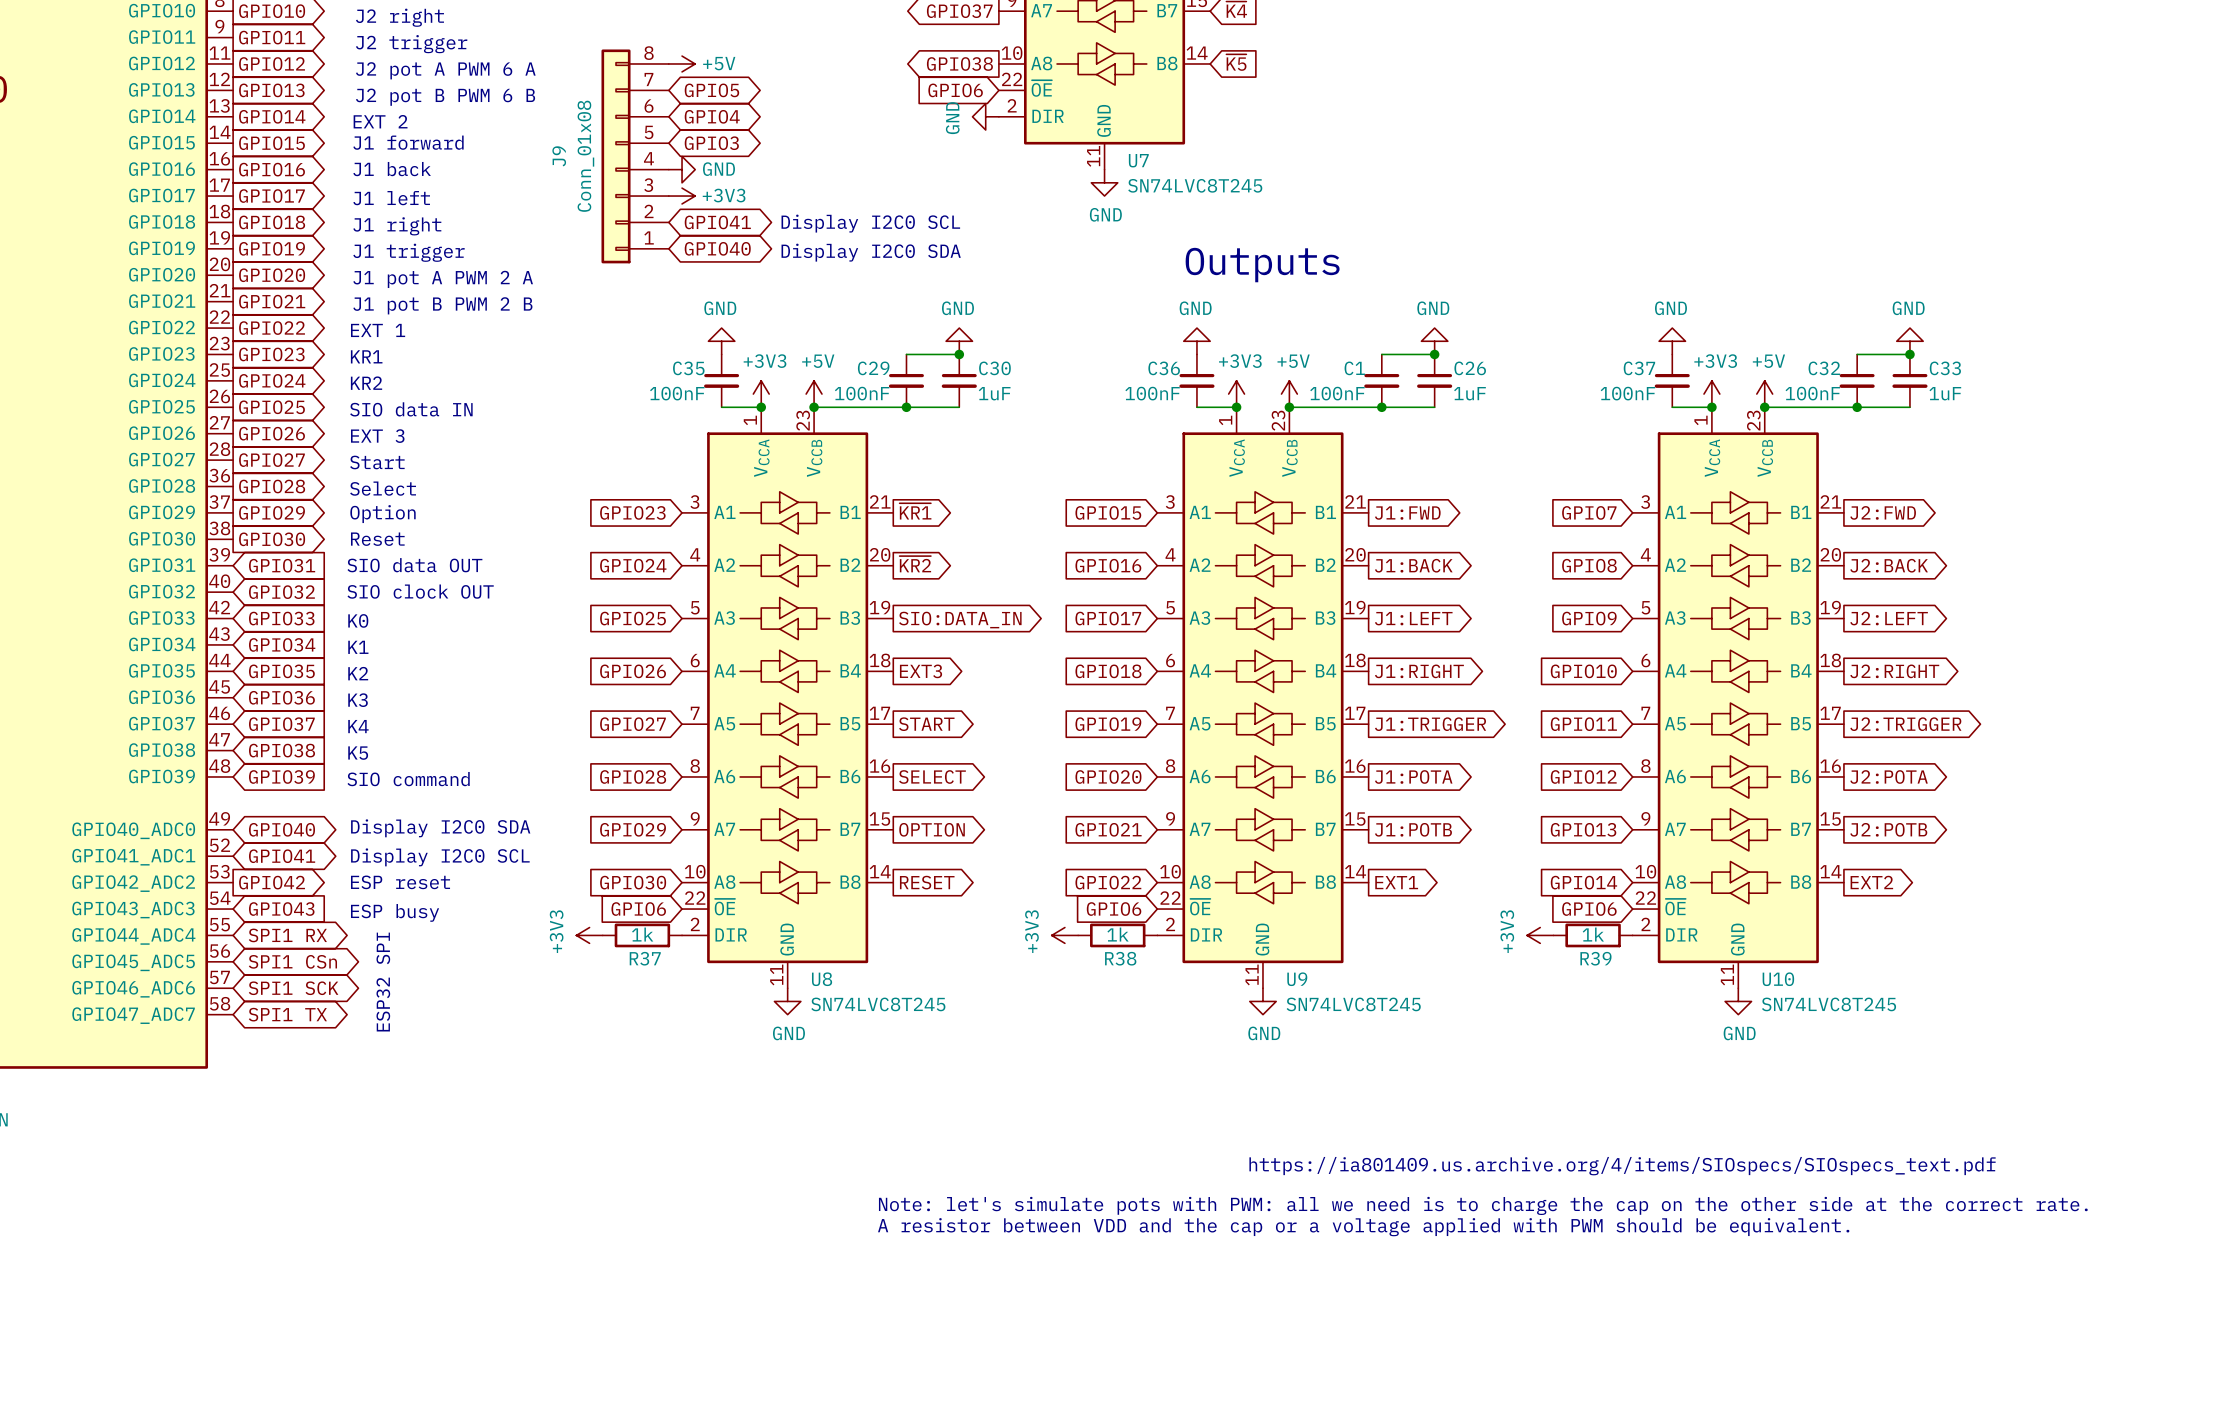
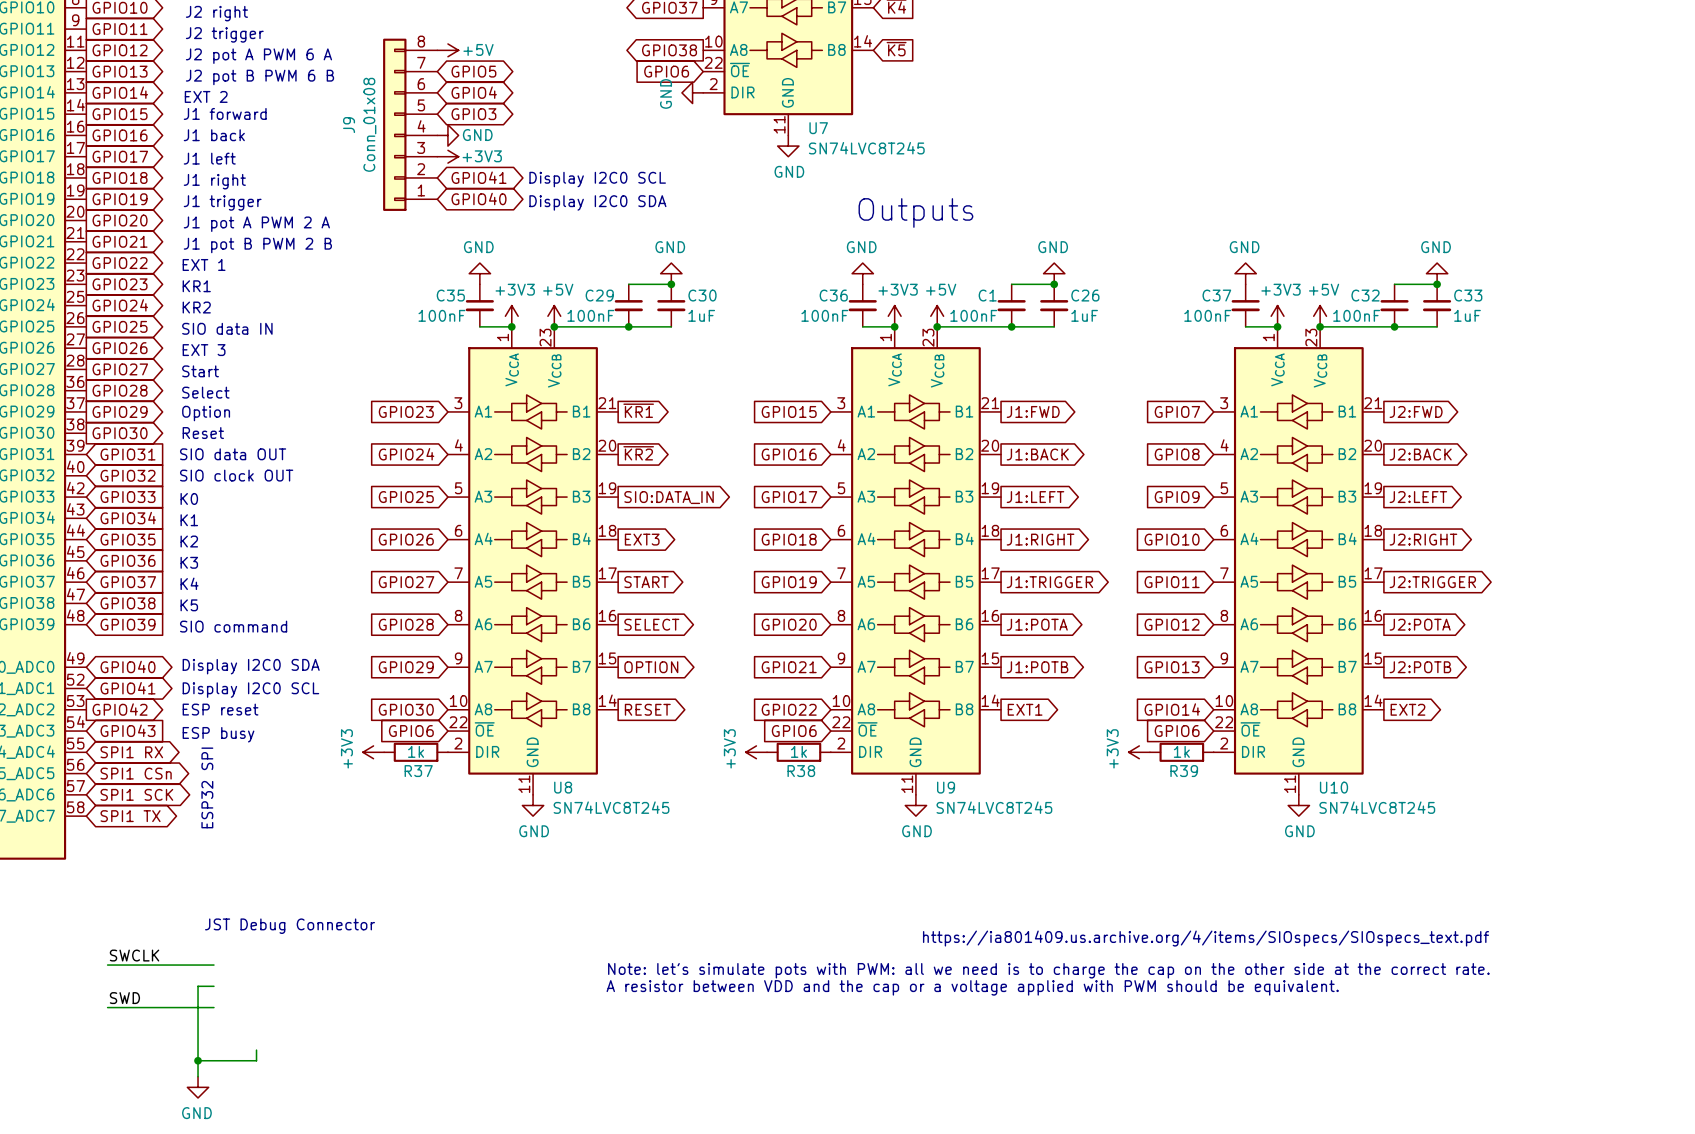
text: none -> JST Debug Connector (290, 926)
label: none -> SWCLK (134, 955)
wire: none -> (107, 965) (213, 965)
wire: none -> (213, 986) (198, 986) (198, 1076)
label: none -> SWD (124, 998)
wire: none -> (107, 1007) (213, 1007)
wire: none -> (256, 1050) (256, 1060) (198, 1060)
junction: none -> (198, 1060)
power symbol: none -> GND (198, 1087)

